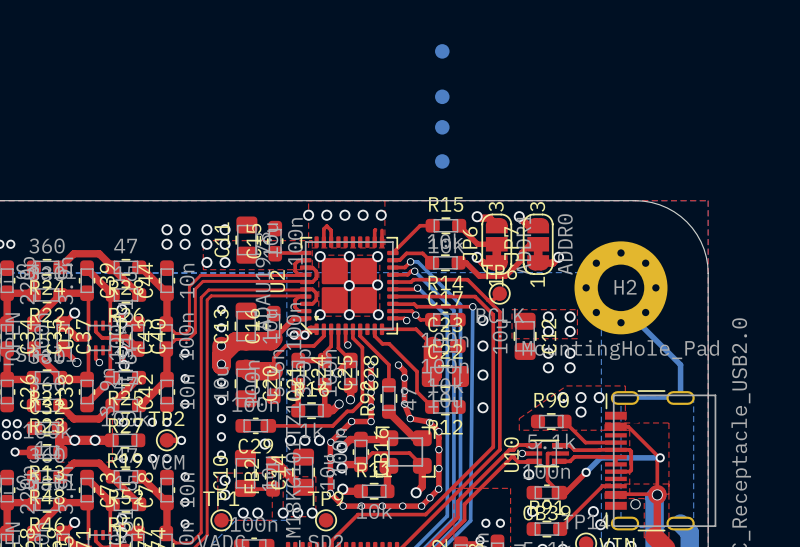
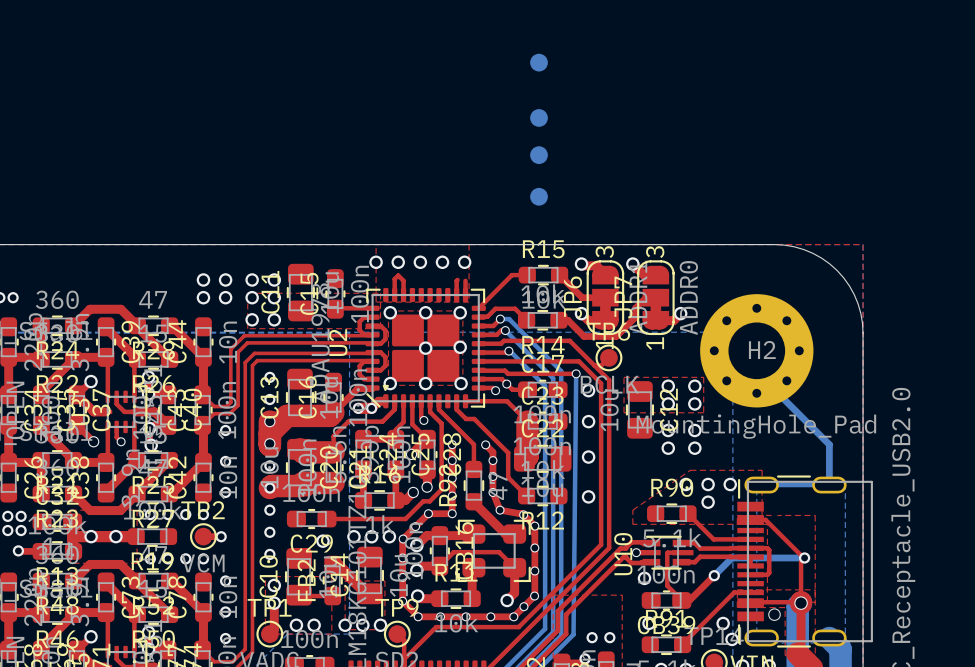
top track: none -> (333, 482) (303, 482) (299, 486) (271, 486) (269, 488)
top track: none -> (274, 603) (274, 629) (269, 634)
top track: none -> (398, 634) (404, 640) (404, 659)

